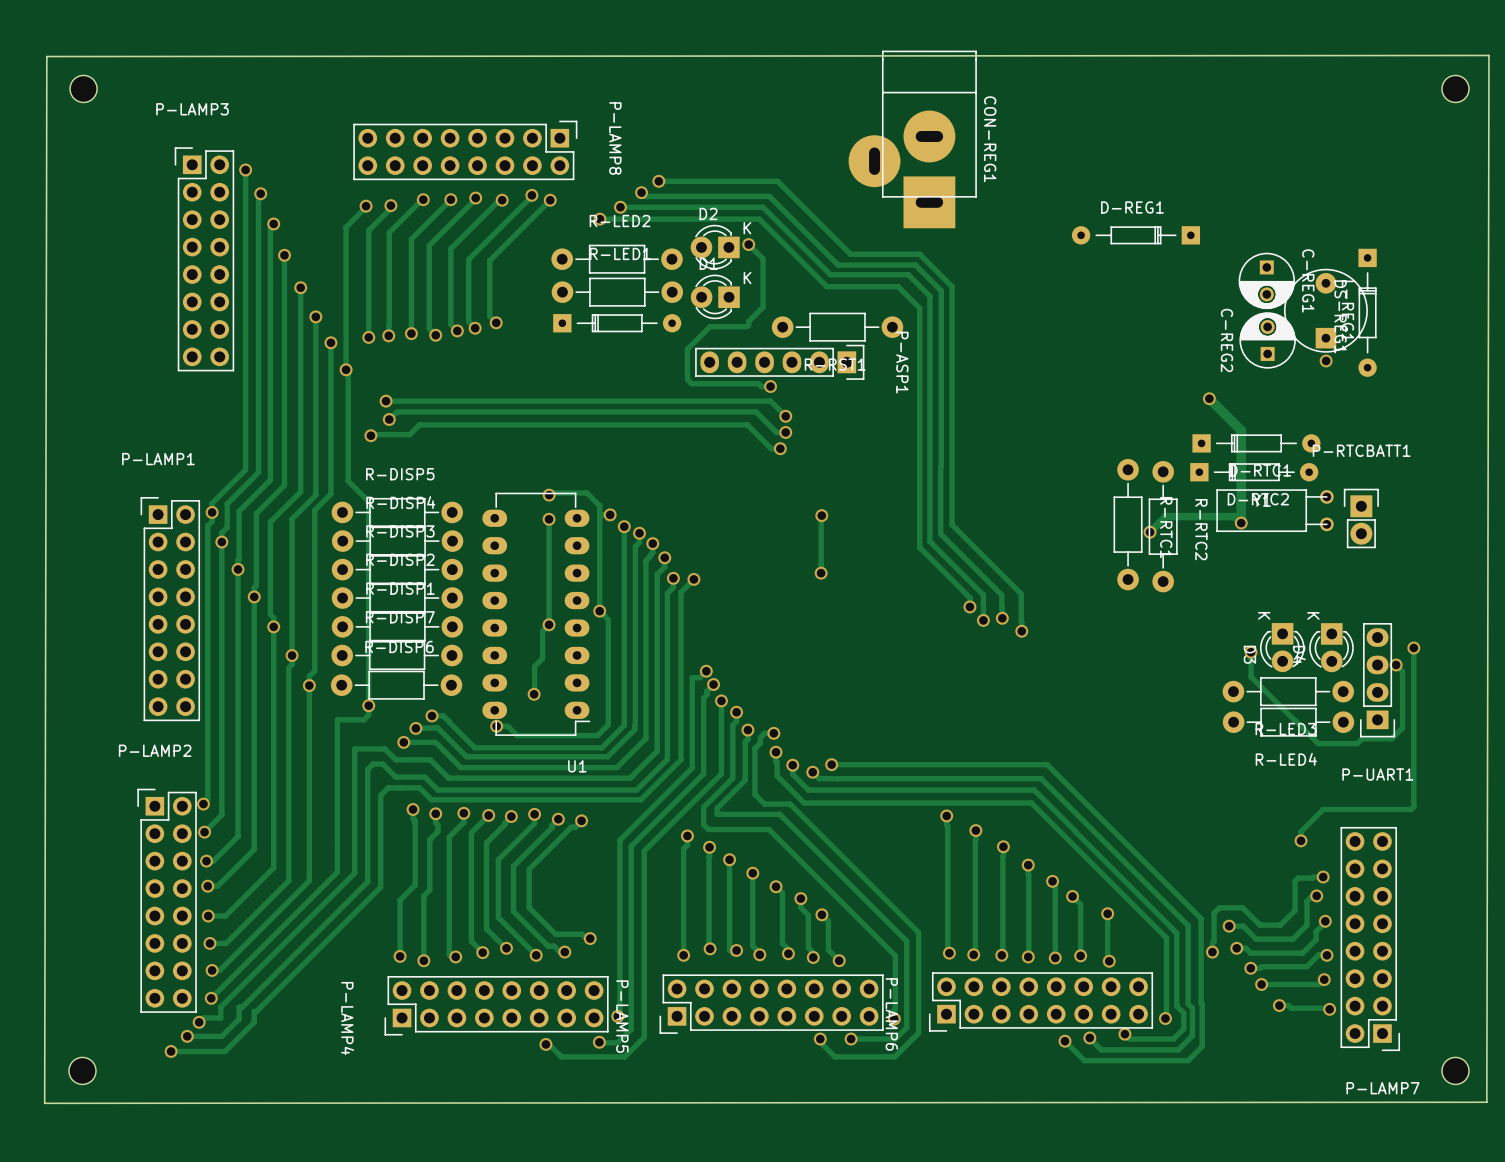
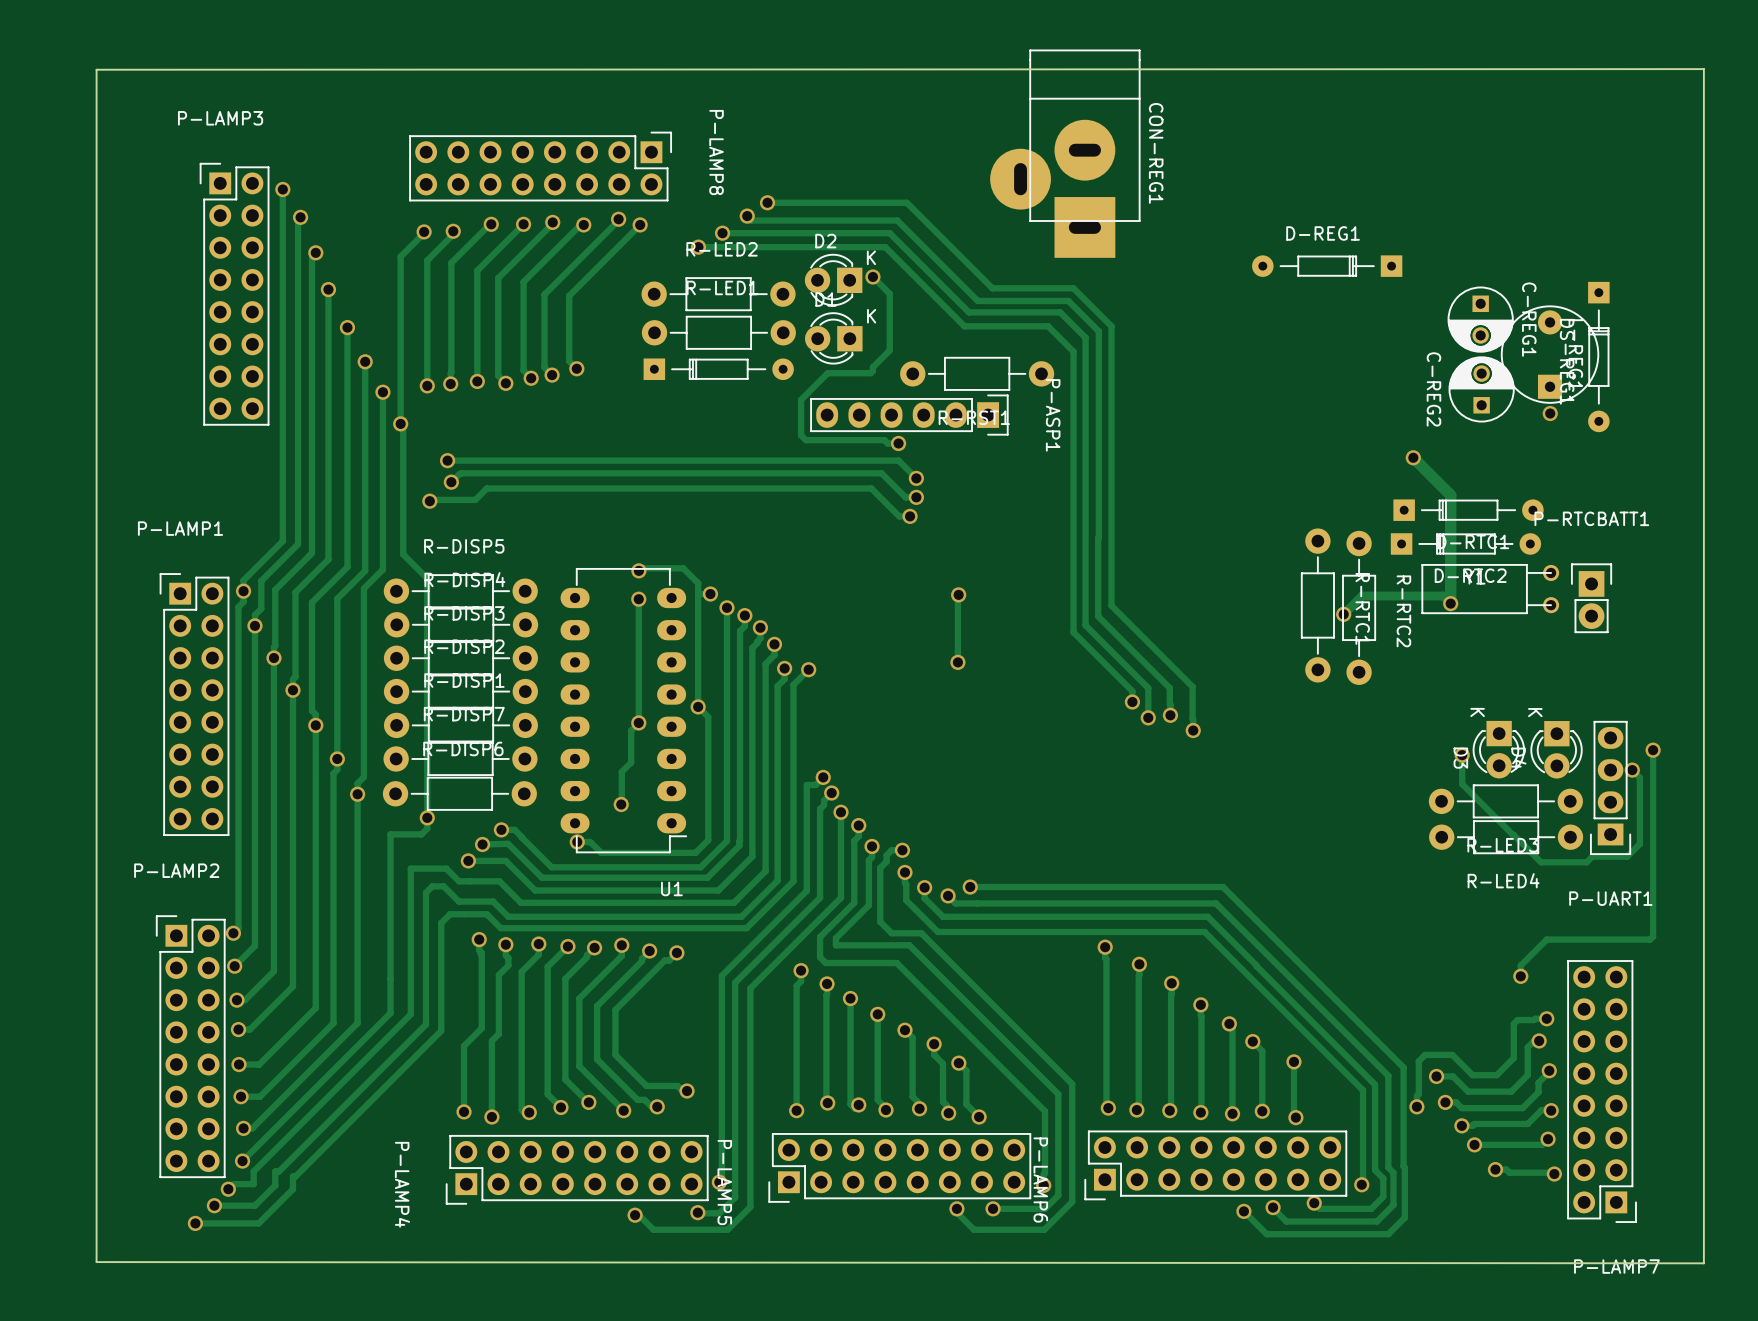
board edge: (1488, 55) (1486, 1102) (44, 1103) (46, 56) (1488, 55) -> (1703, 69) (1703, 1263) (96, 1262) (96, 69) (1703, 69)
part: (83, 88) -> none
part: (1455, 88) -> none
part: (82, 1070) -> none
part: (1455, 1070) -> none

